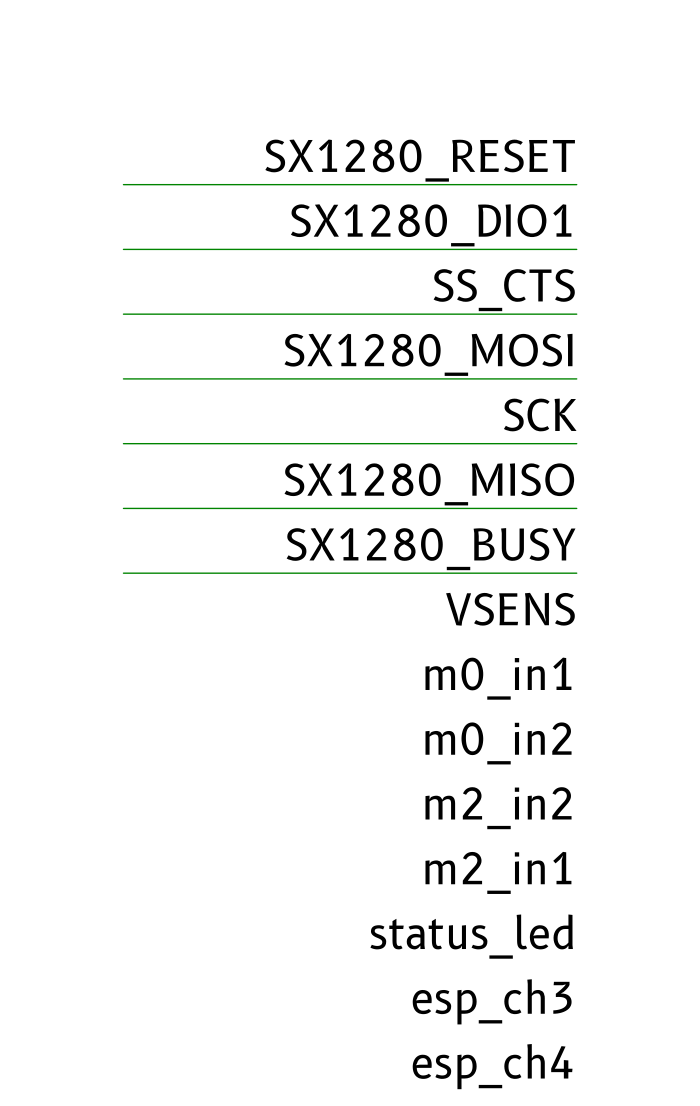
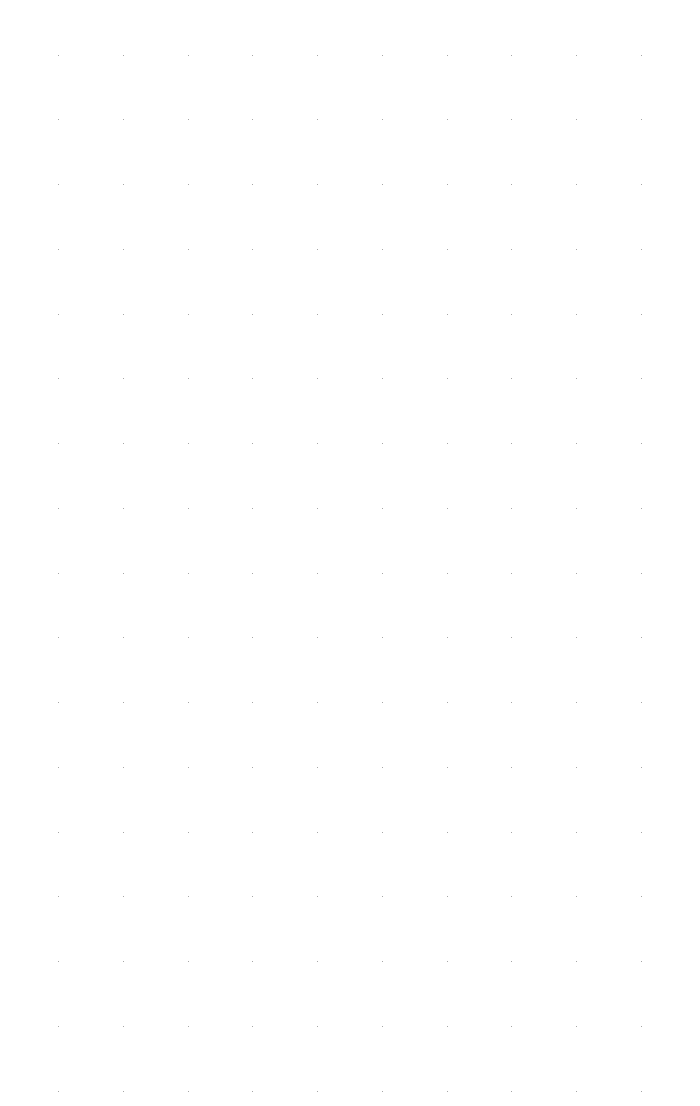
label: SX1280_RESET (420, 160) -> none
wire: (123, 184) (576, 184) -> none
label: SX1280_DIO1 (431, 225) -> none
wire: (123, 249) (576, 249) -> none
label: SS_CTS (504, 290) -> none
wire: (123, 314) (576, 314) -> none
label: SX1280_MOSI (428, 354) -> none
wire: (123, 378) (576, 378) -> none
label: SCK (540, 414) -> none
wire: (123, 443) (576, 443) -> none
label: SX1280_MISO (429, 484) -> none
wire: (123, 508) (576, 508) -> none
label: SX1280_BUSY (431, 549) -> none
wire: (123, 573) (576, 573) -> none
label: VSENS (510, 609) -> none
label: m0_in1 (498, 678) -> none
label: m0_in2 (498, 743) -> none
label: m2_in2 (498, 808) -> none
label: m2_in1 (498, 872) -> none
label: status_led (471, 936) -> none
label: esp_ch3 (492, 1001) -> none
label: esp_ch4 (492, 1066) -> none

